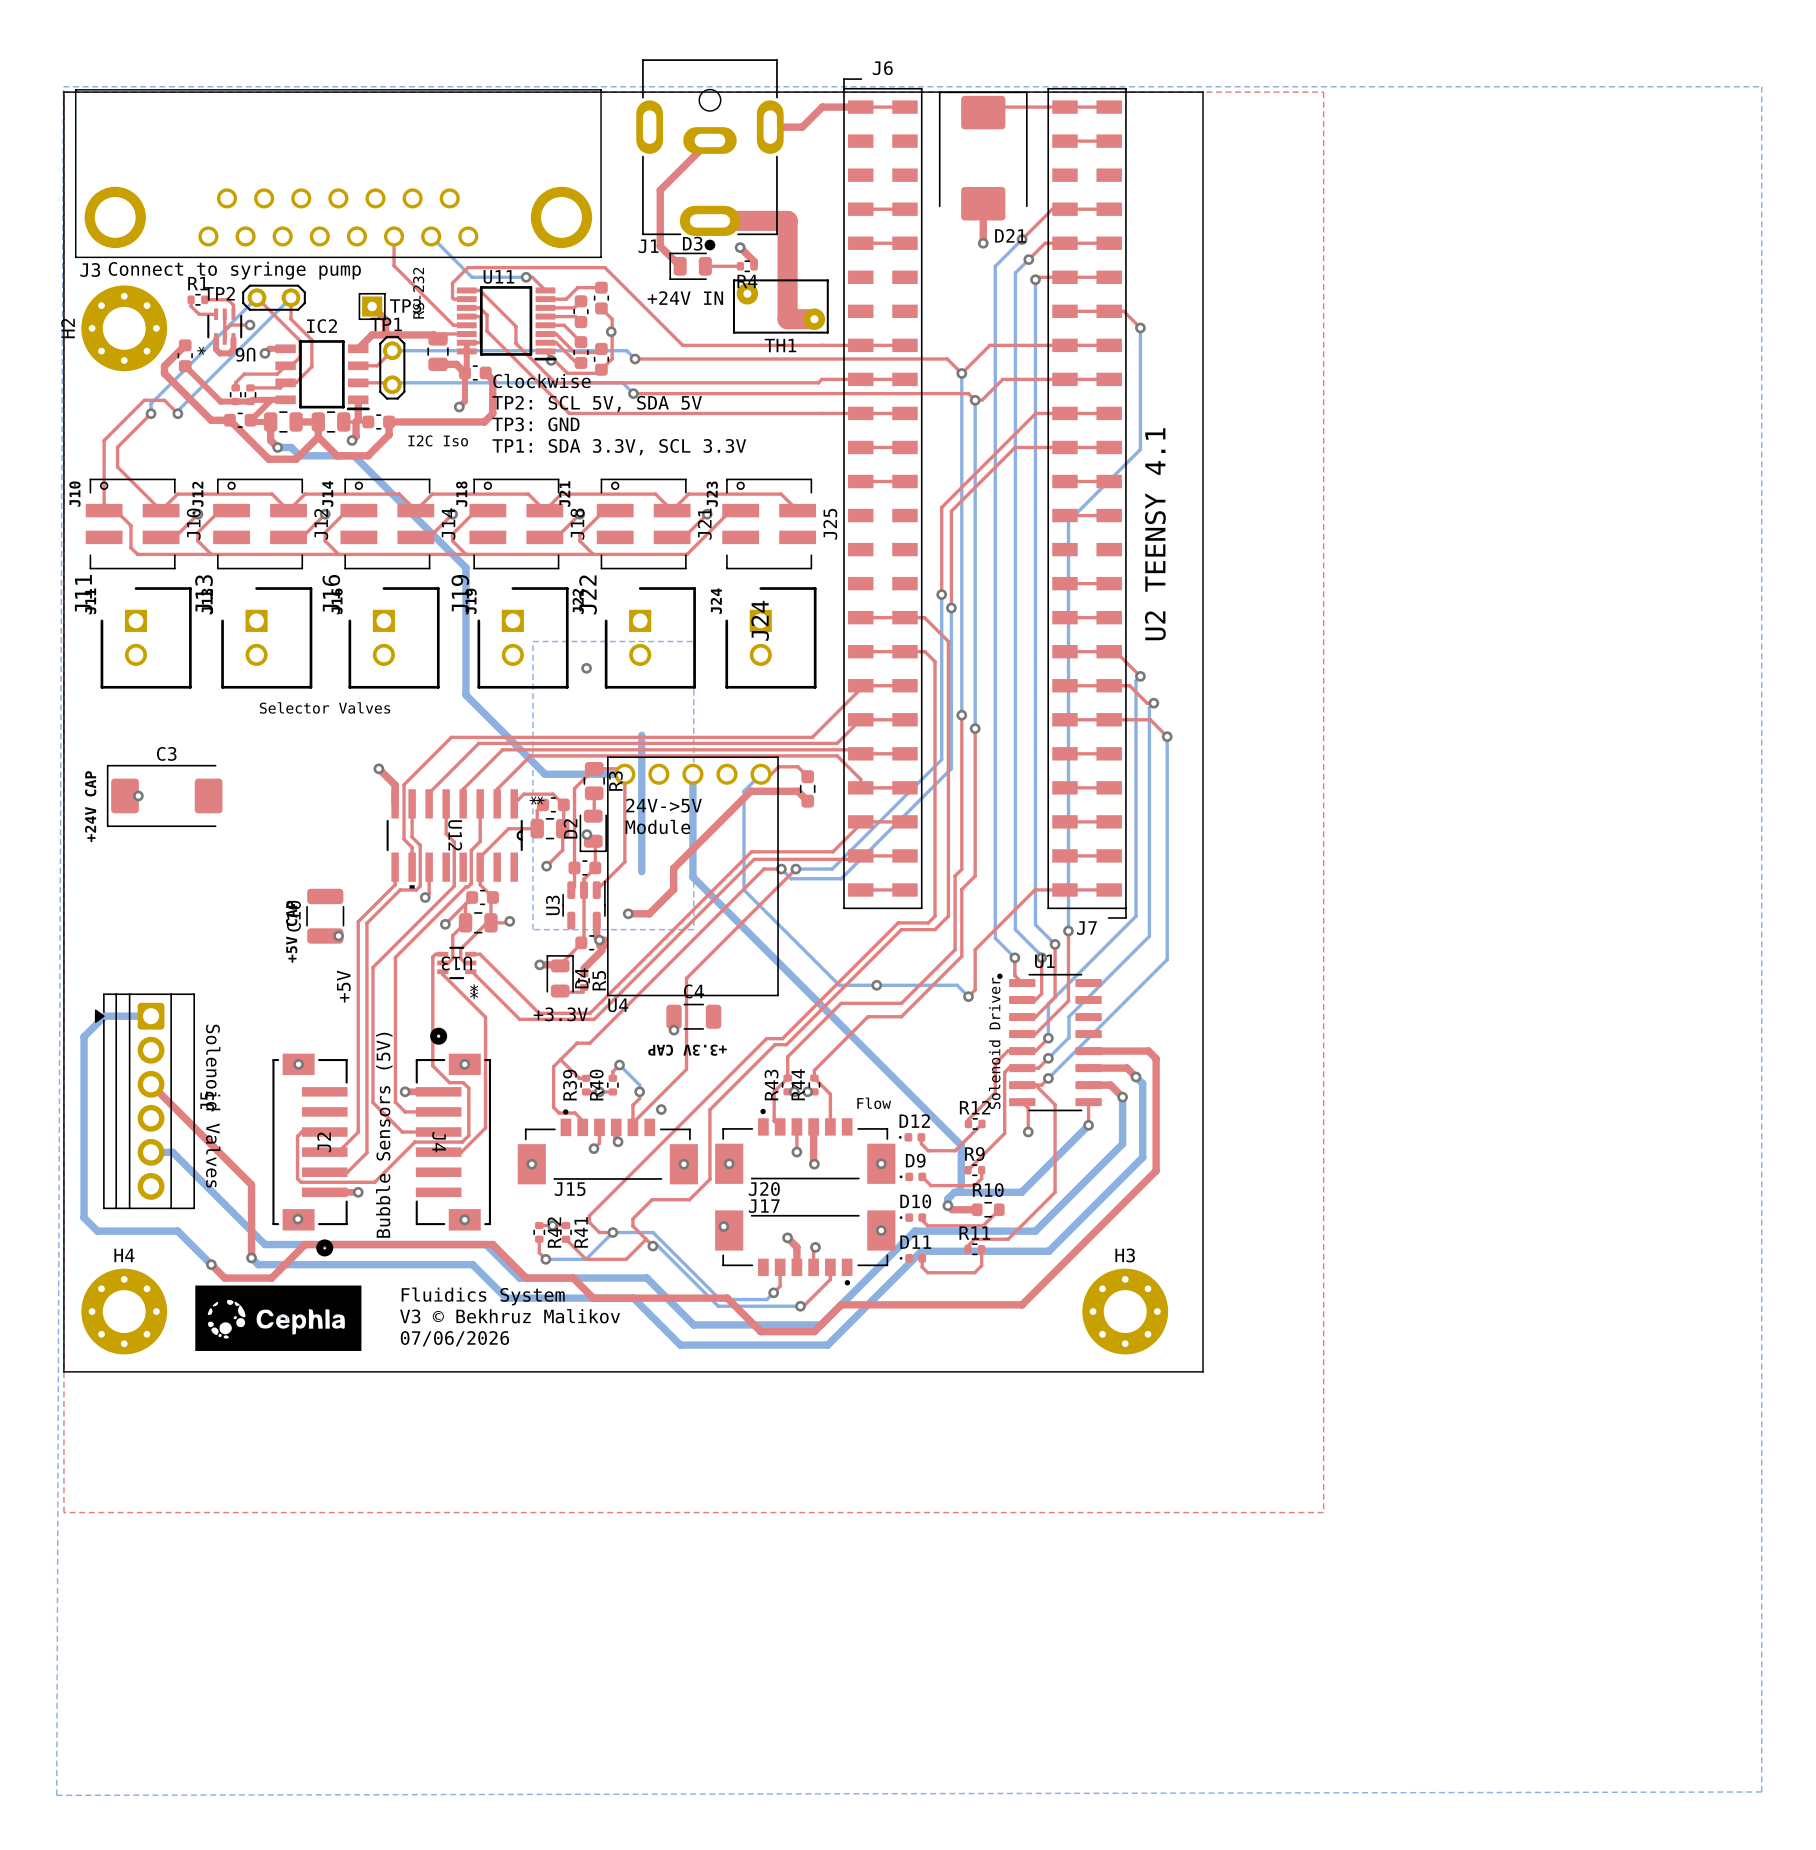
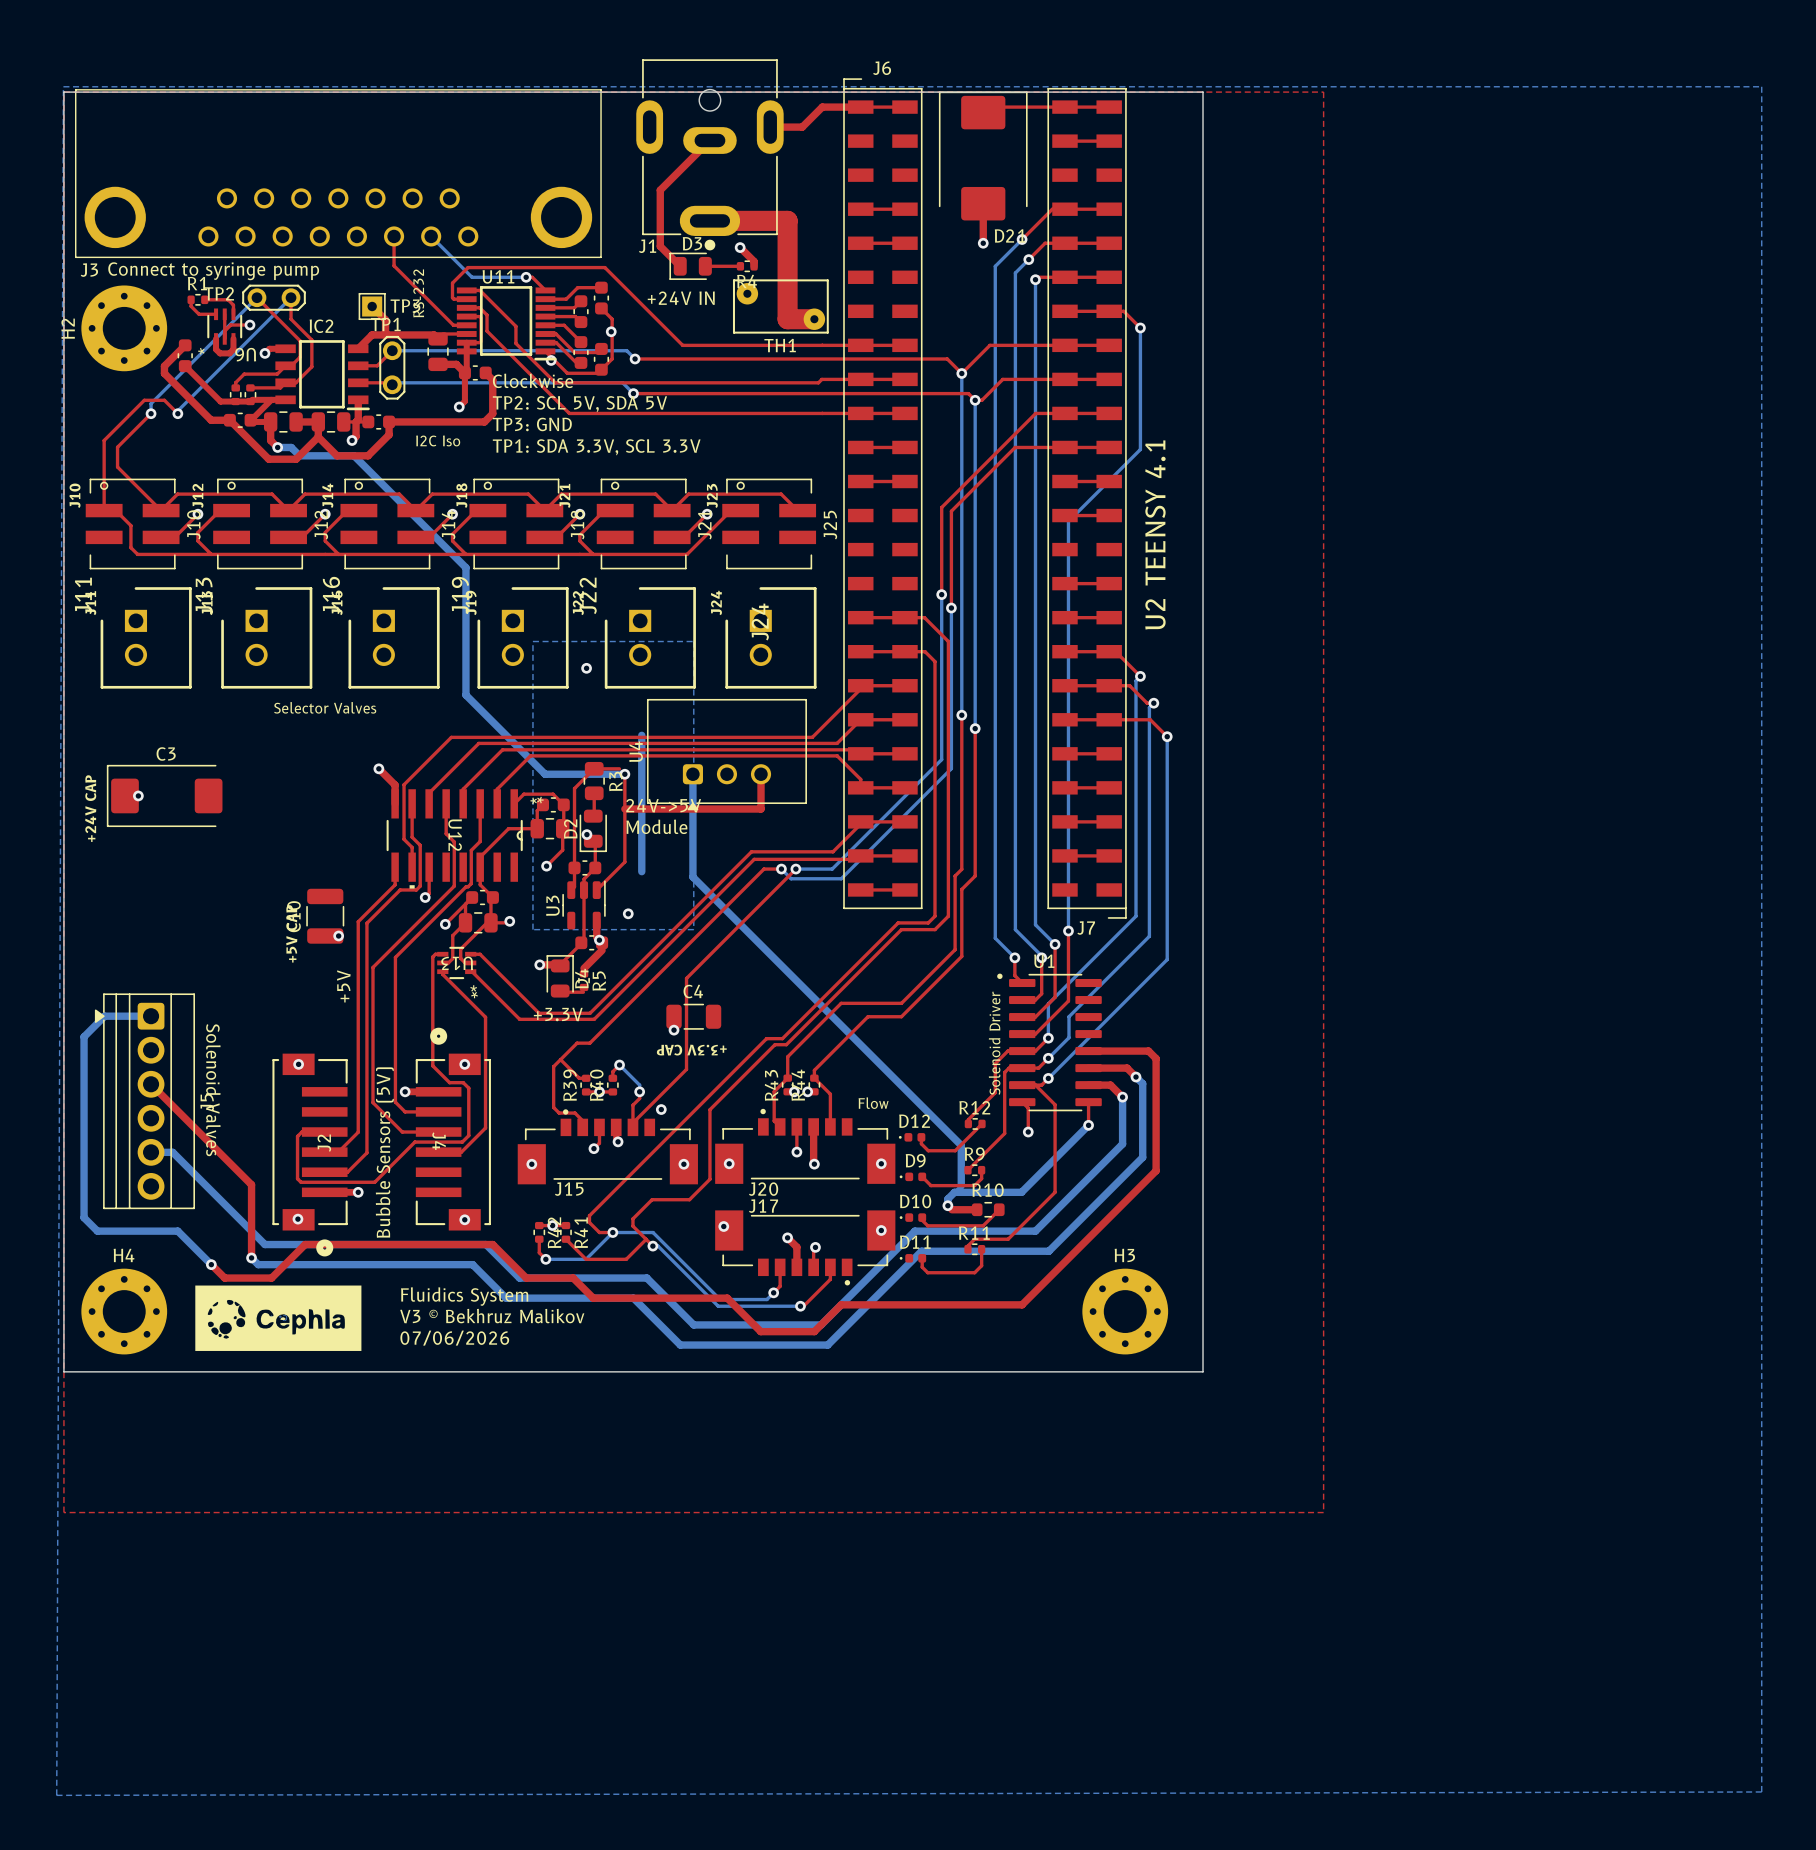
U4 footprint: [607, 756, 779, 997] -> [646, 698, 807, 811]
via: none -> (624, 774)
top track: (761, 774) (771, 774) (778, 766) (797, 766) (807, 776) -> (761, 774) (761, 809) (624, 809)
bottom track: (761, 774) (743, 791) (743, 889) (839, 985) (957, 985) (968, 996) -> none
part: (807, 788) -> none
top track: (807, 801) (797, 791) (750, 791) (673, 868) (673, 889) (649, 913) (628, 913) -> none
top track: (1109, 889) (1034, 889) (975, 949) (975, 989) (968, 996) -> none
via: (876, 985) -> none
via: (968, 996) -> none
U4 name position: U4 (618, 1005) -> U4 (636, 751)

